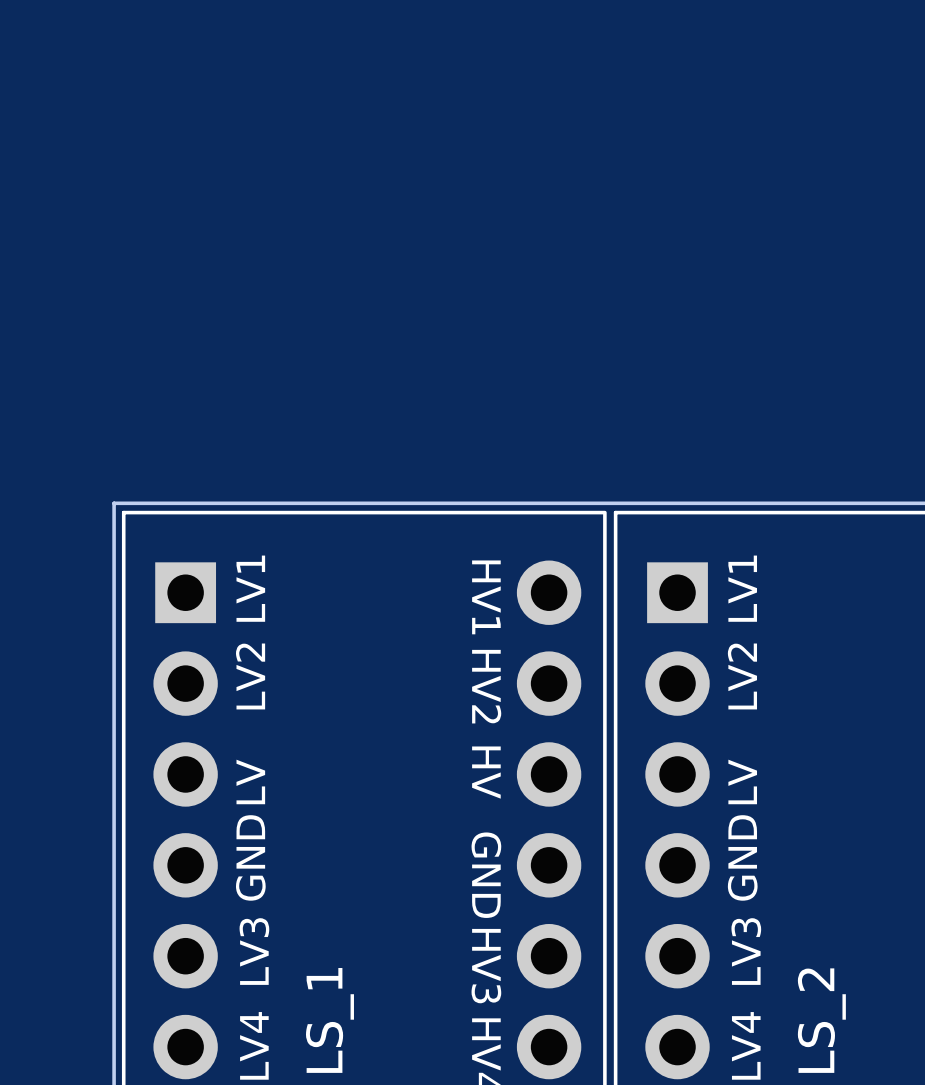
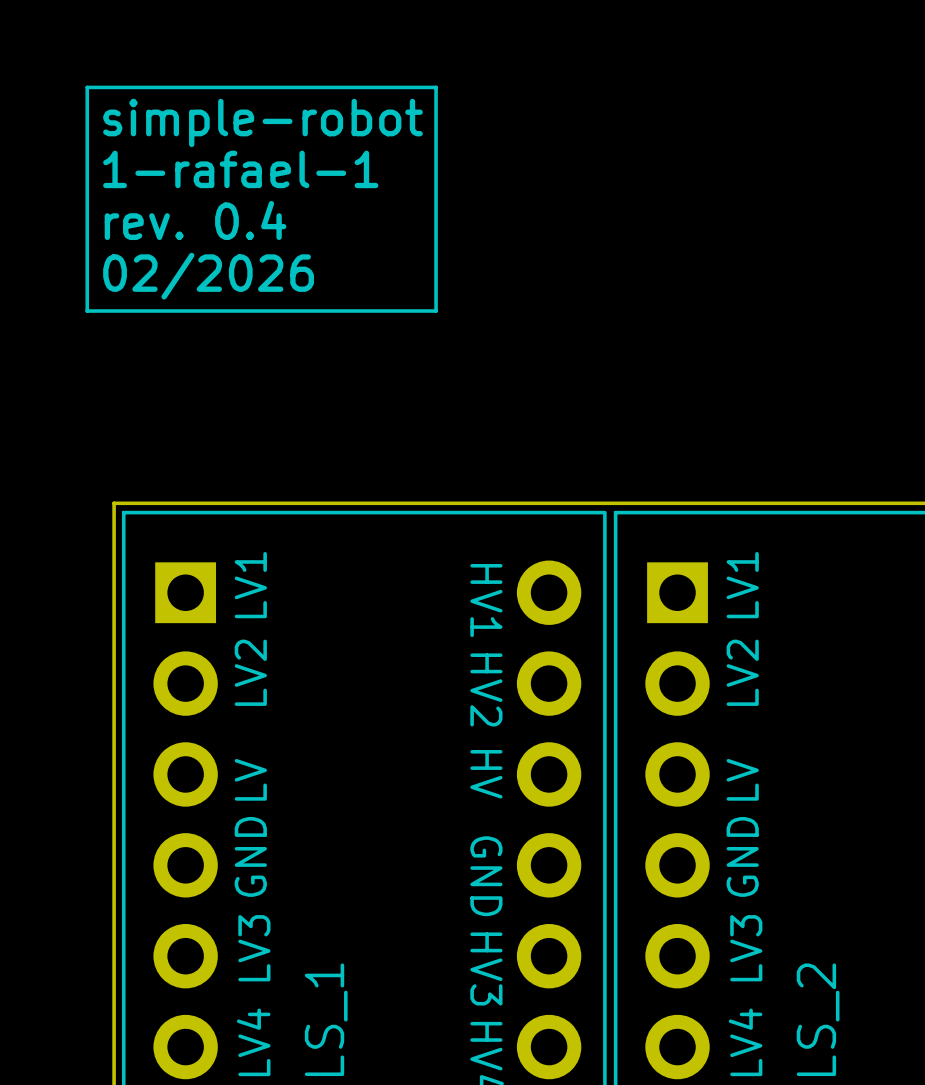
line: none -> (87, 87) (436, 87) (436, 311) (87, 311) (87, 87)
text: none -> simple-robot (263, 122)
text: none -> 1-rafael-1 (240, 169)
text: none -> rev. 0.4 (195, 220)
text: none -> 02/2026 (208, 276)

